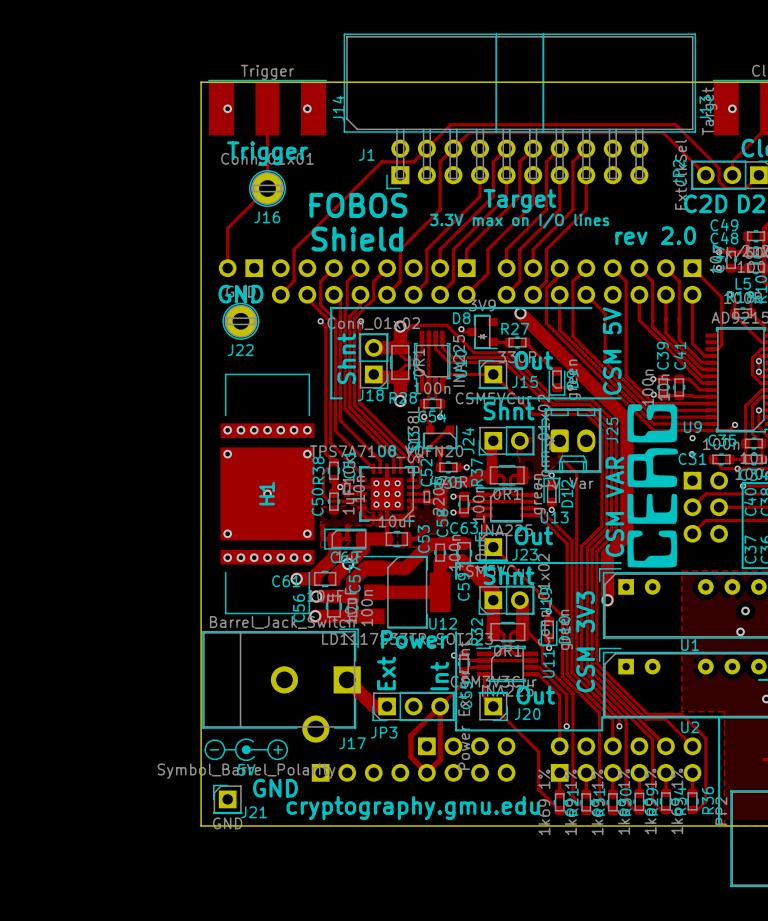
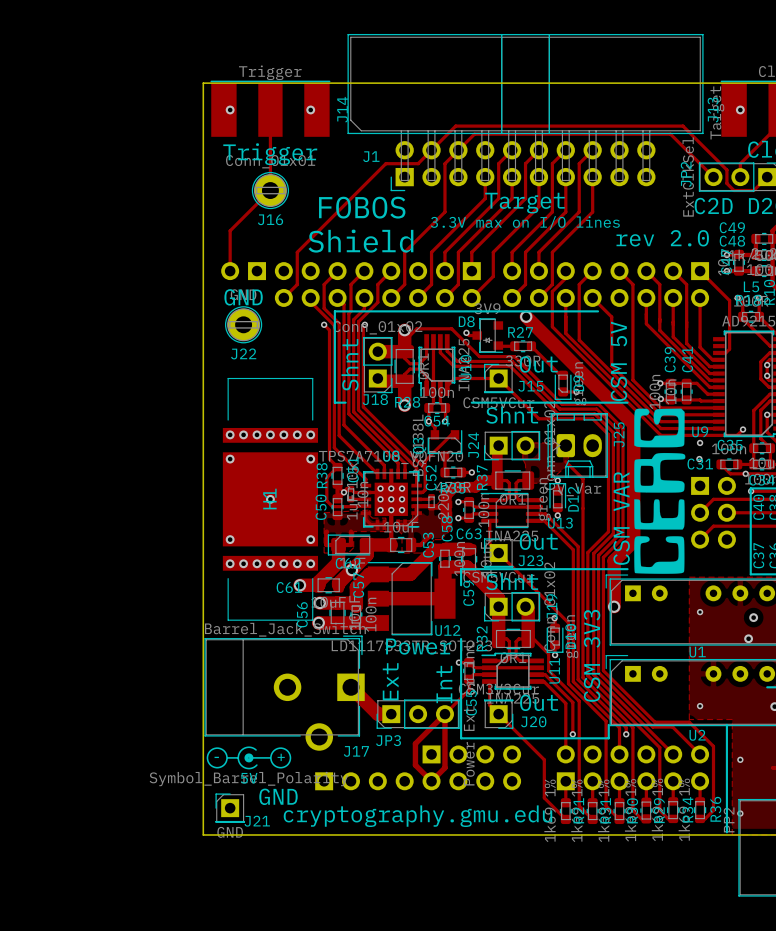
via: none -> (700, 612)
via: none -> (700, 706)
via: none -> (740, 759)
via: none -> (740, 813)

